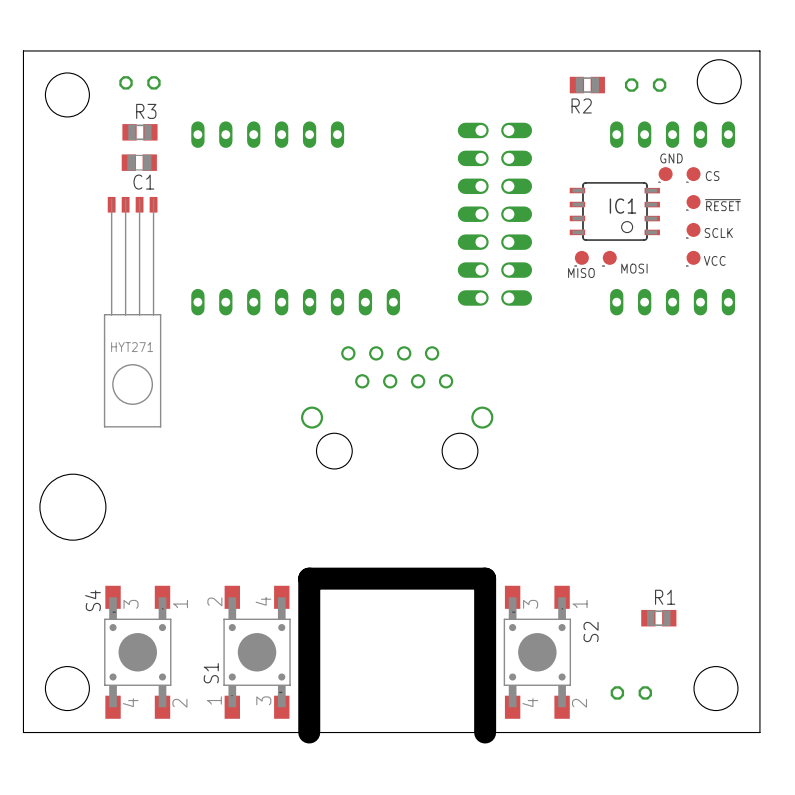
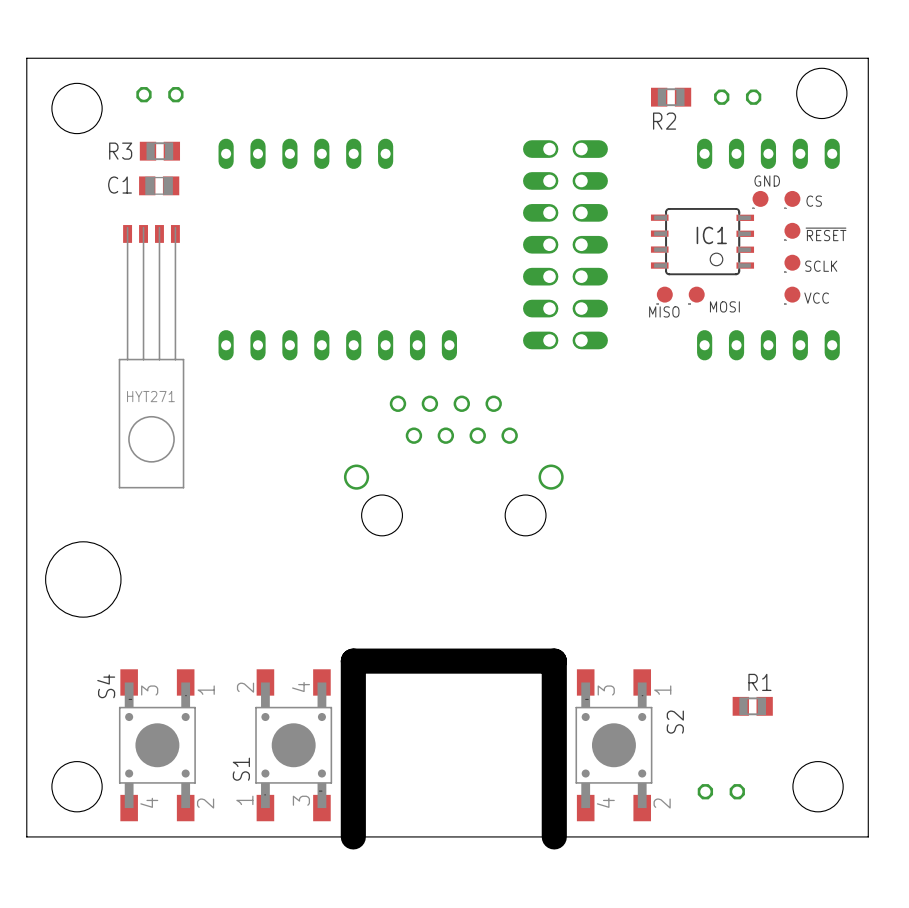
R3 name position: R3 (146, 111) -> R3 (120, 151)
C1 name position: C1 (143, 182) -> C1 (120, 185)

